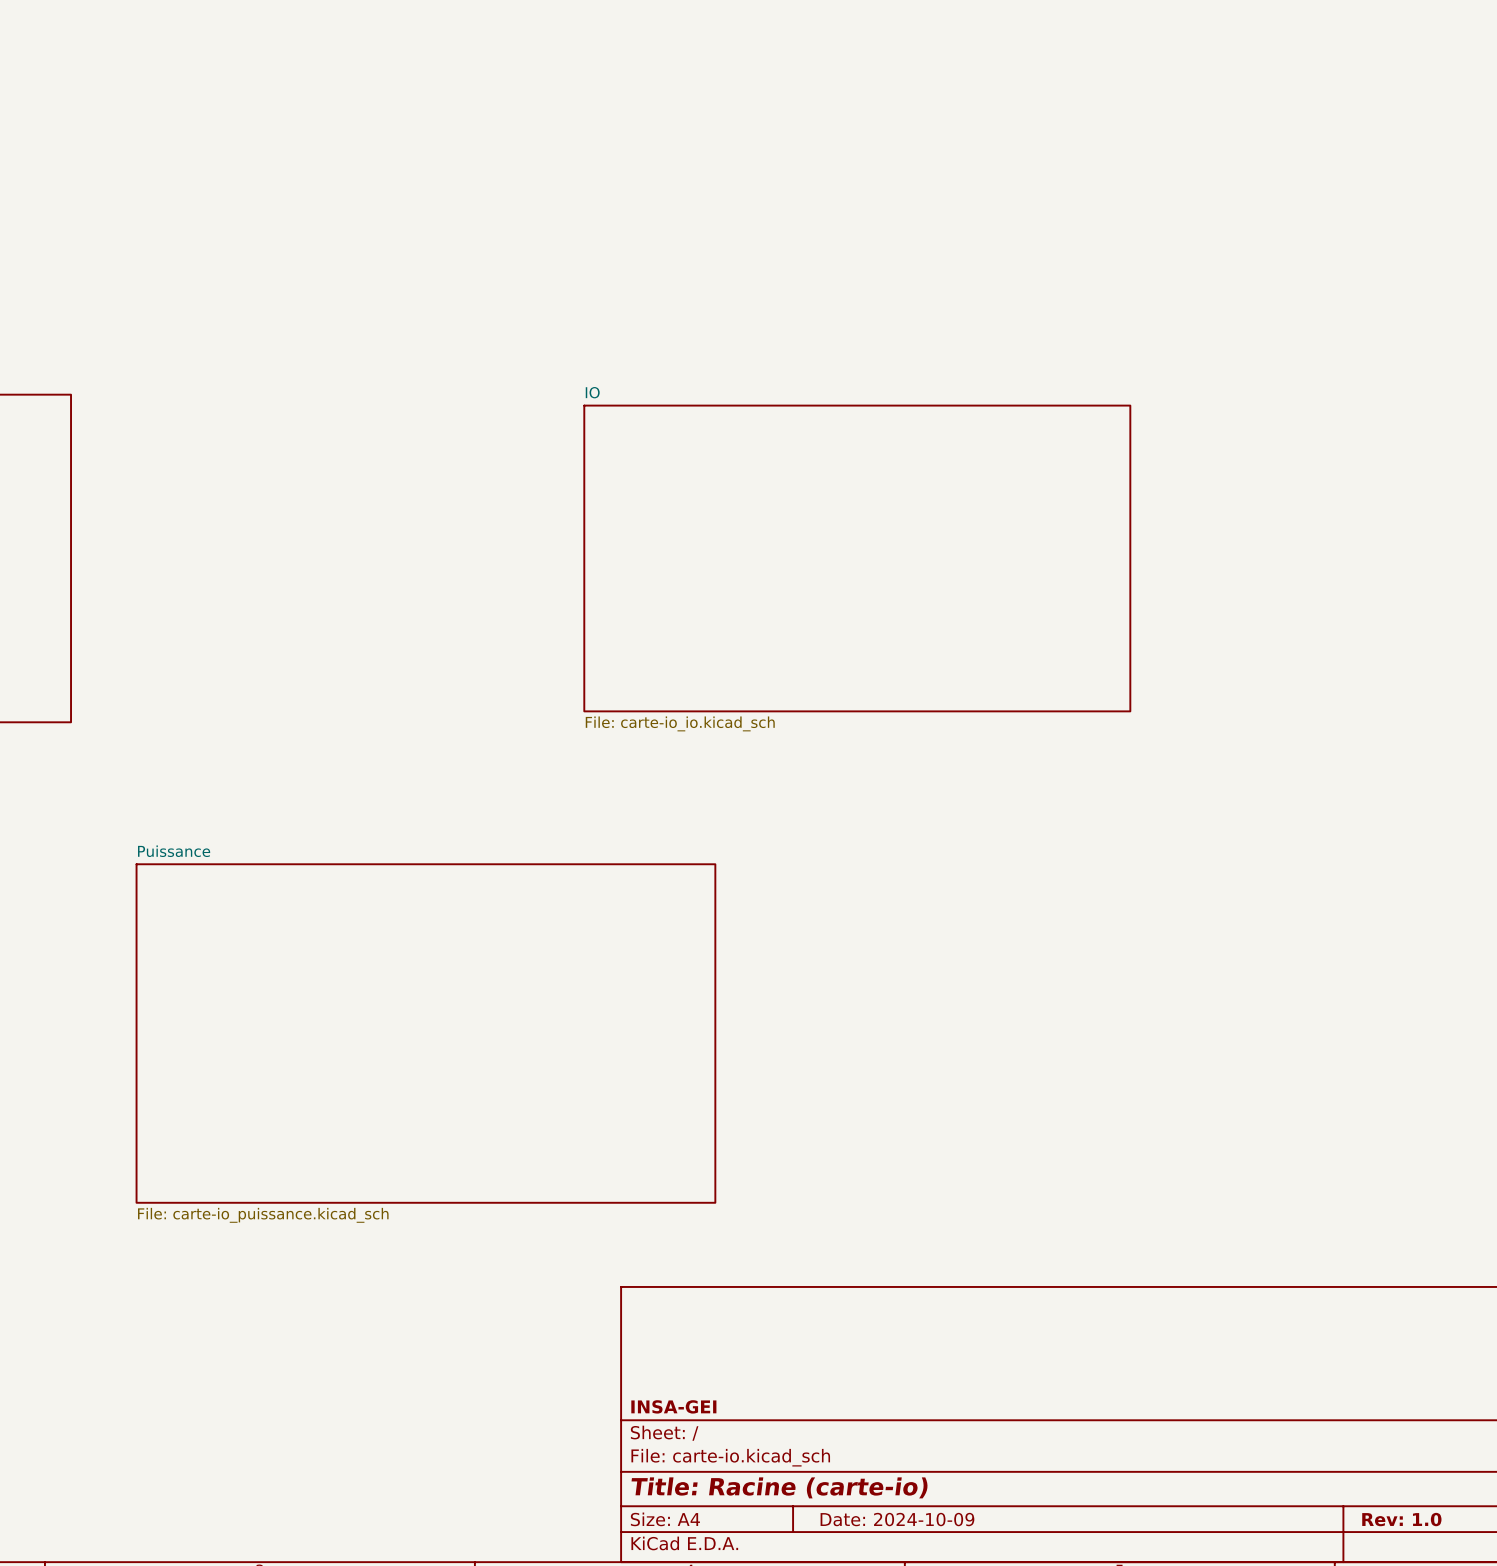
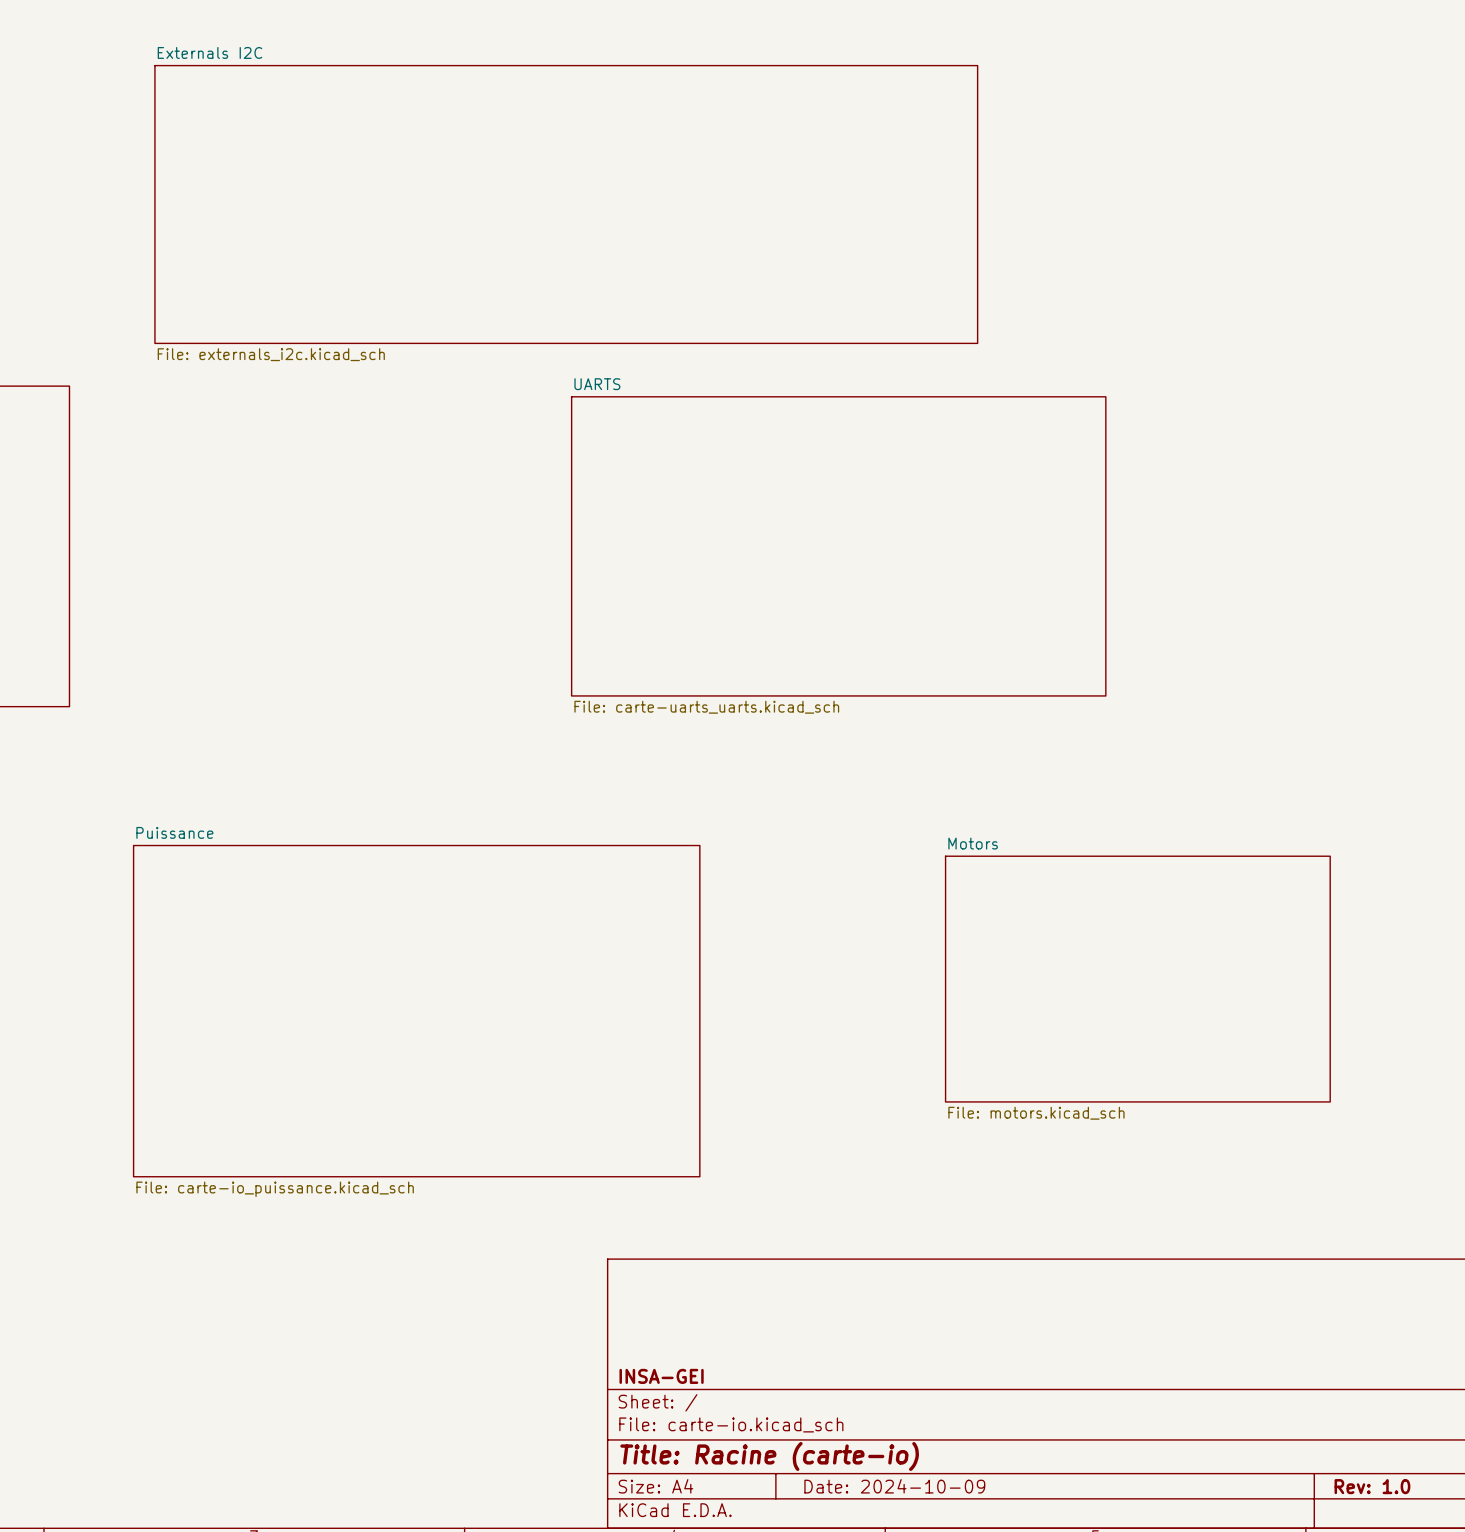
sheet Externals I2C: none -> File: externals_i2c.kicad_sch (566, 204)
sheet IO name: IO (592, 392) -> UARTS (597, 384)
sheet IO value: File: carte-io_io.kicad_sch (680, 723) -> File: carte-uarts_uarts.kicad_sch (706, 707)
sheet Motors: none -> File: motors.kicad_sch (1137, 979)

